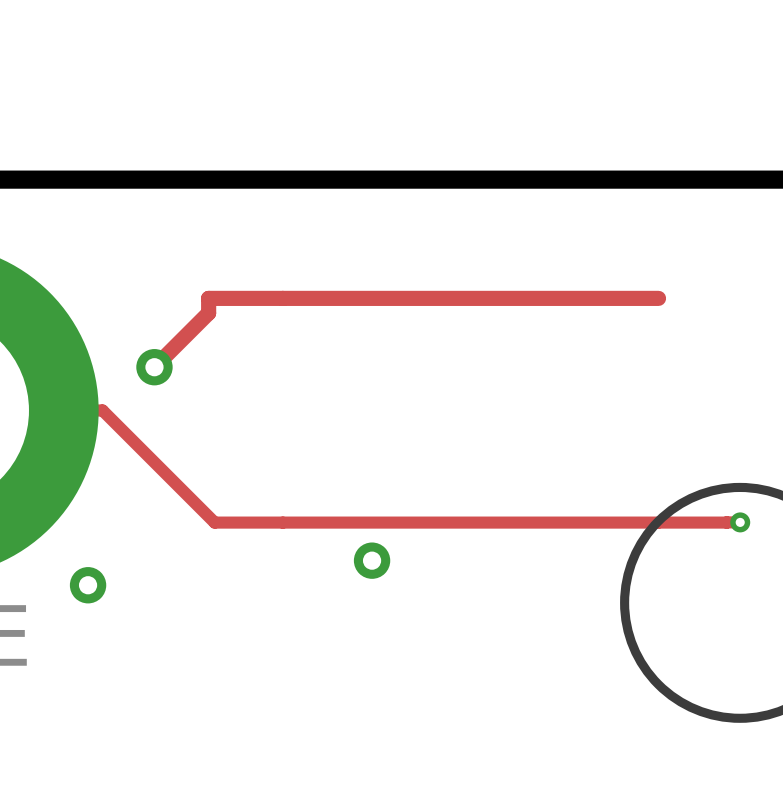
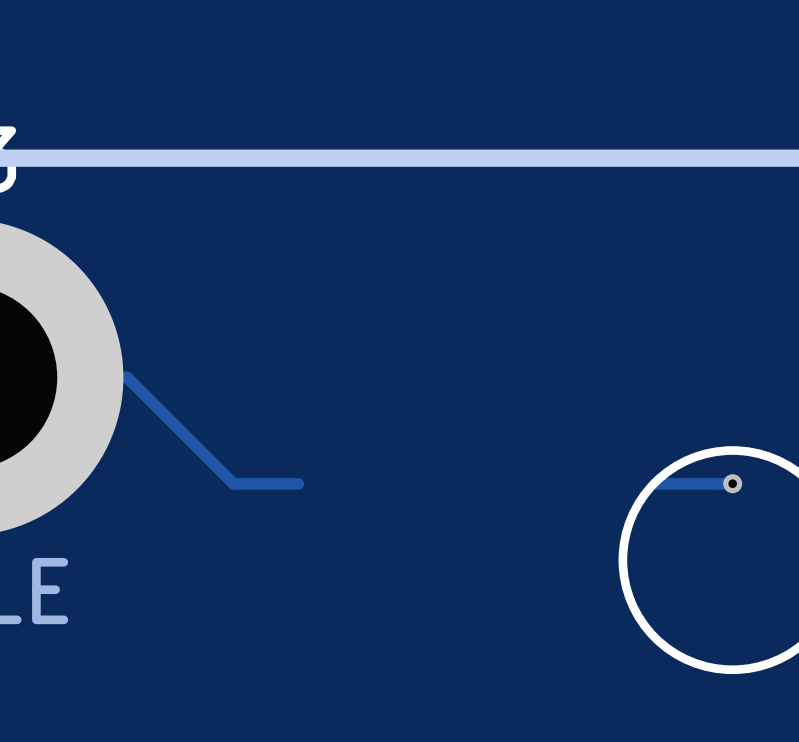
track: (658, 298) (208, 298) (208, 313) (154, 367) -> none
via: (154, 367) -> none
track: (282, 522) (658, 522) -> none
via: (372, 560) -> none
via: (88, 585) -> none

